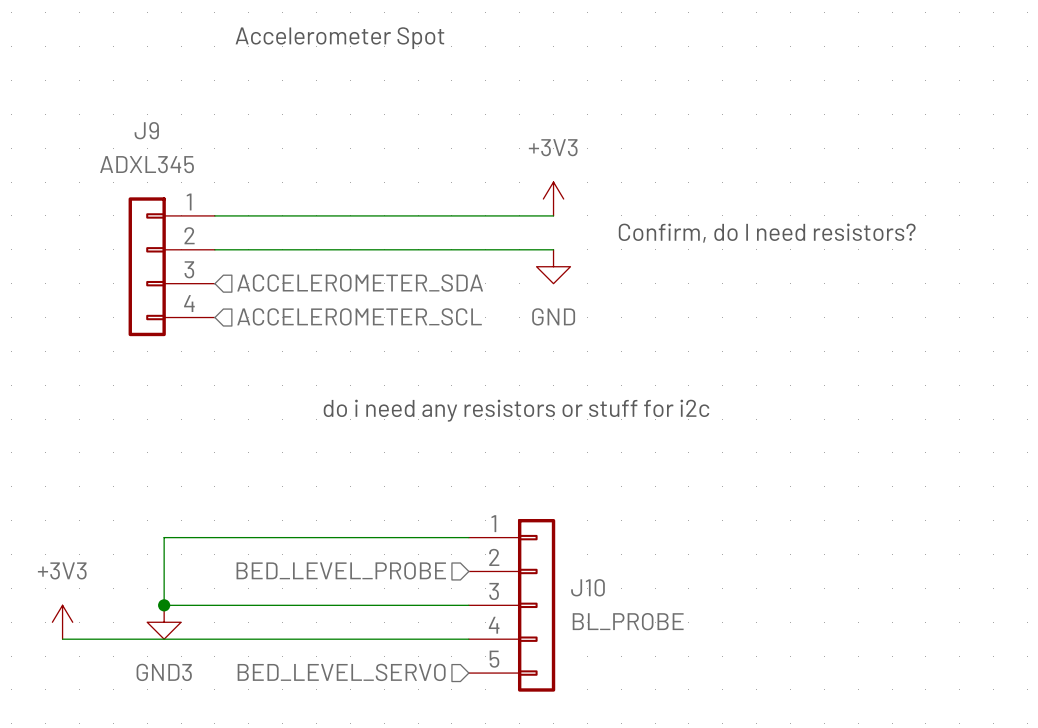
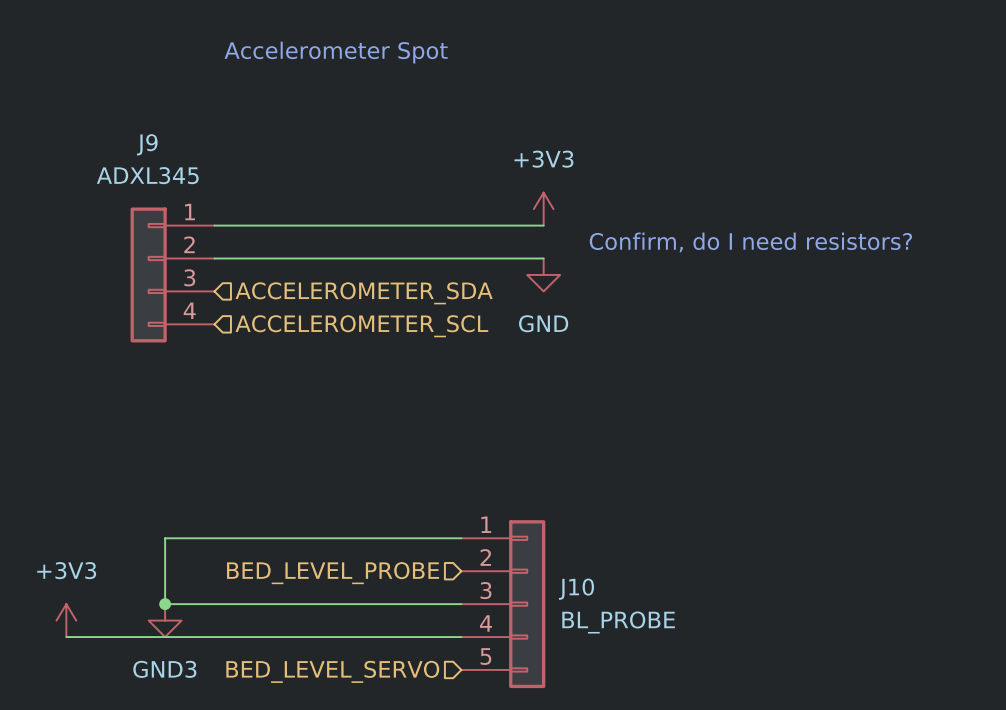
text: do i need any resistors or stuff for i2c (516, 410) -> none

